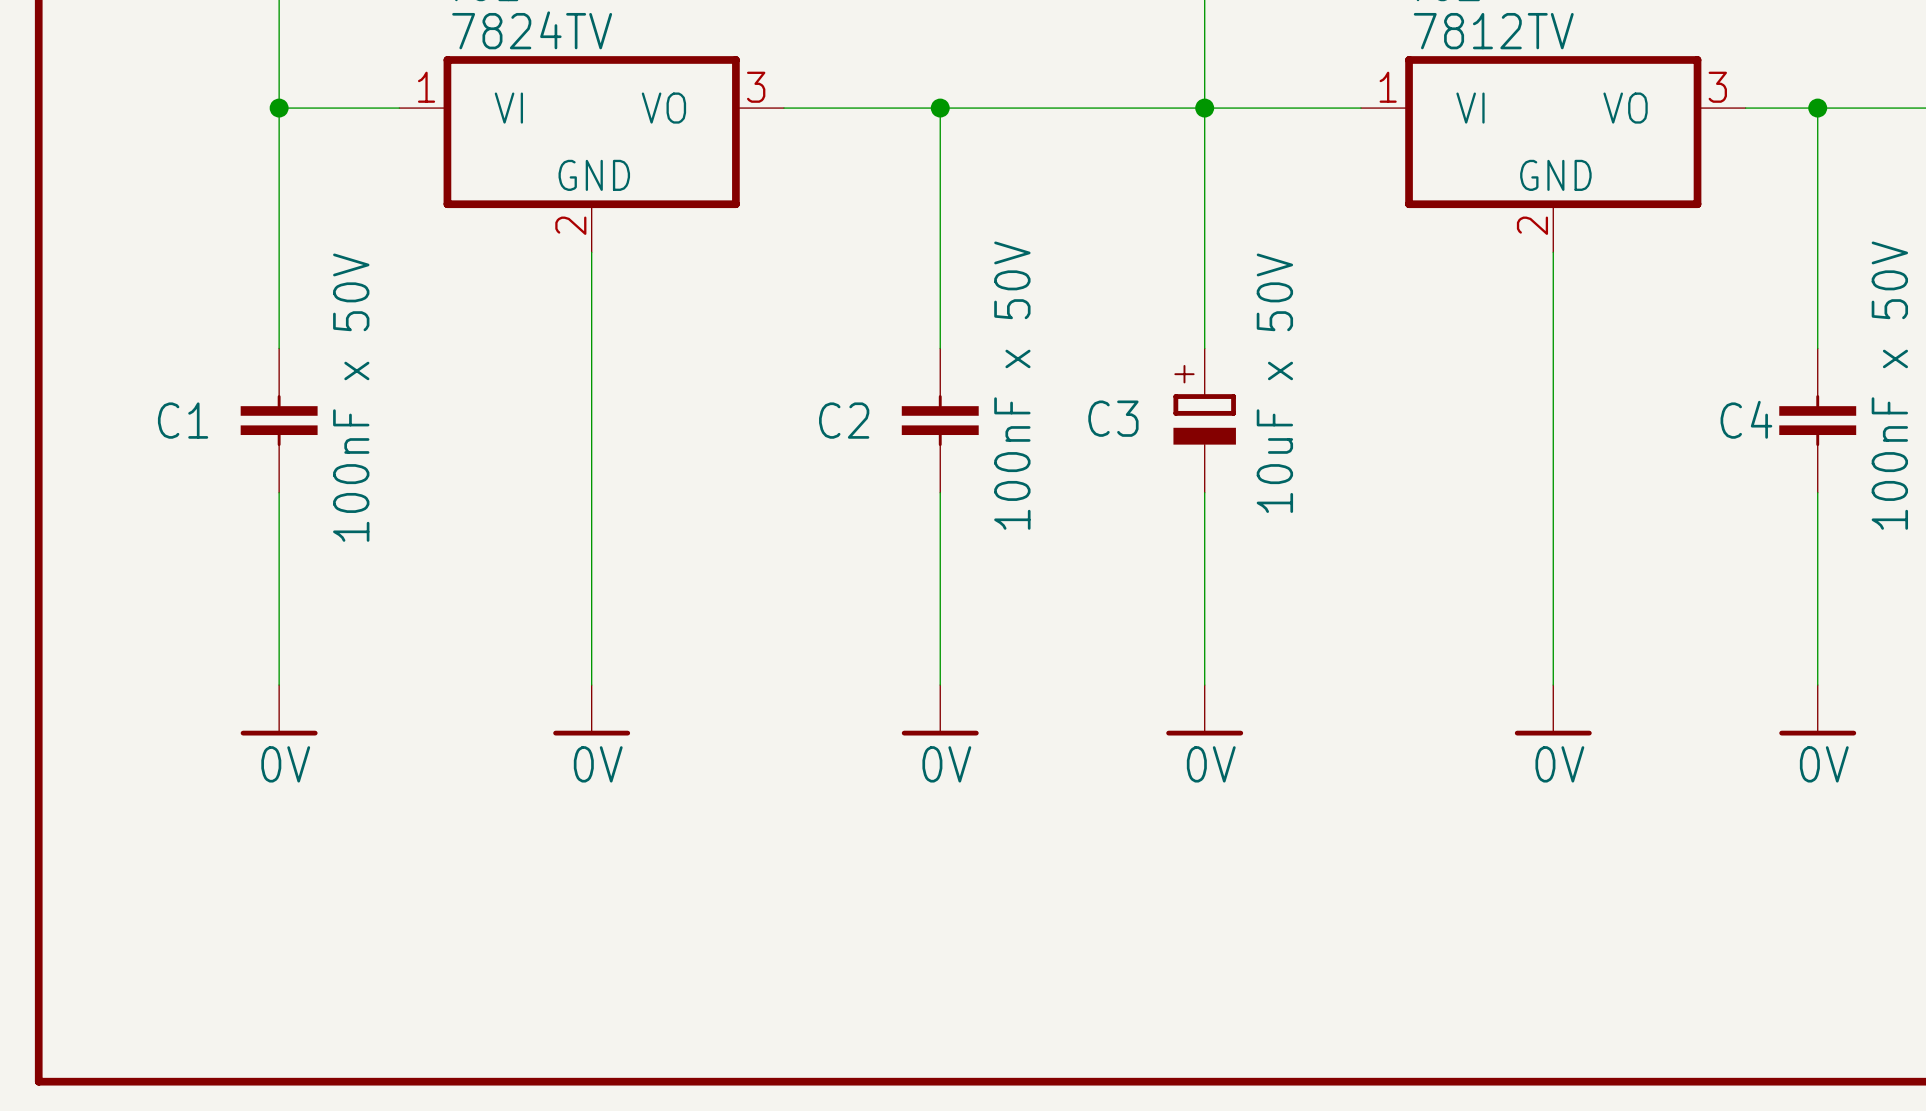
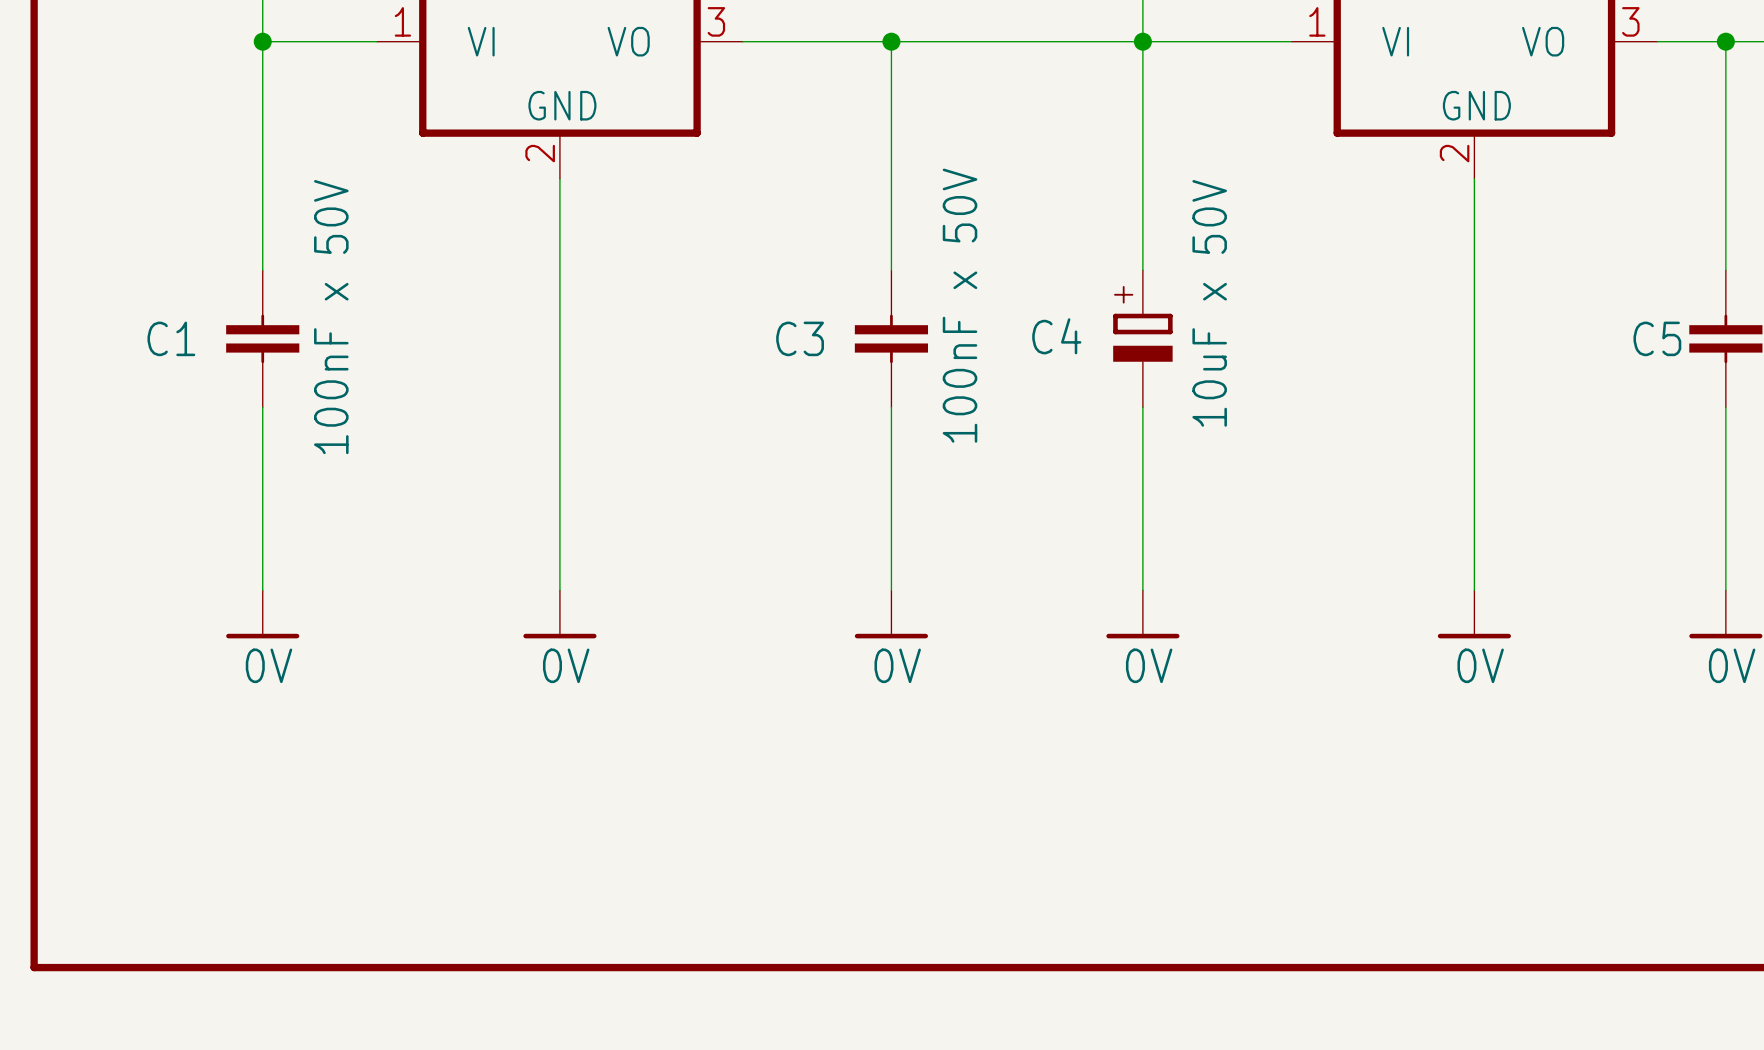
C3 name: C3 (1113, 418) -> C4 (1056, 336)
C4 name: C4 (1746, 419) -> C5 (1657, 338)
C2 name: C2 (844, 420) -> C3 (800, 338)

